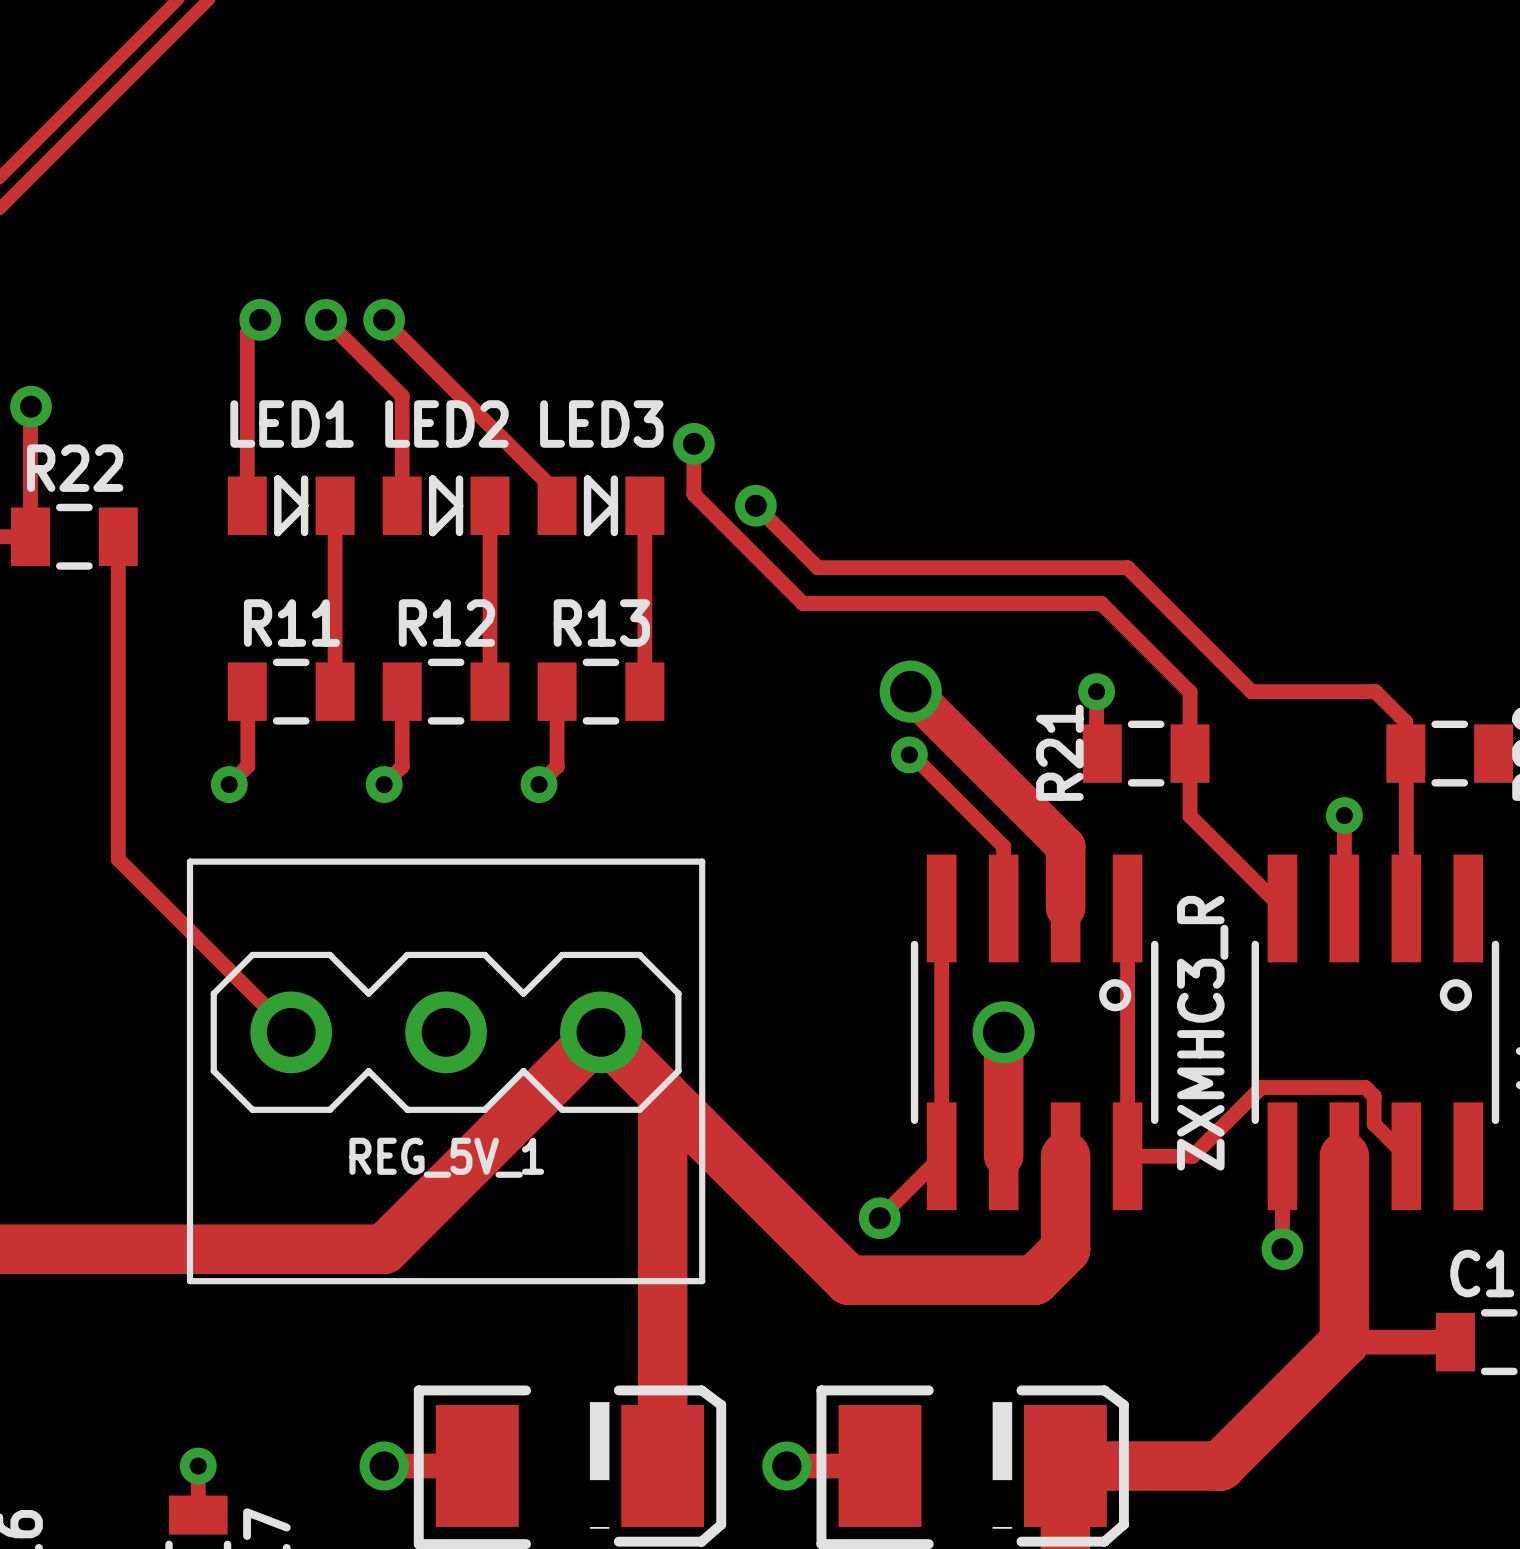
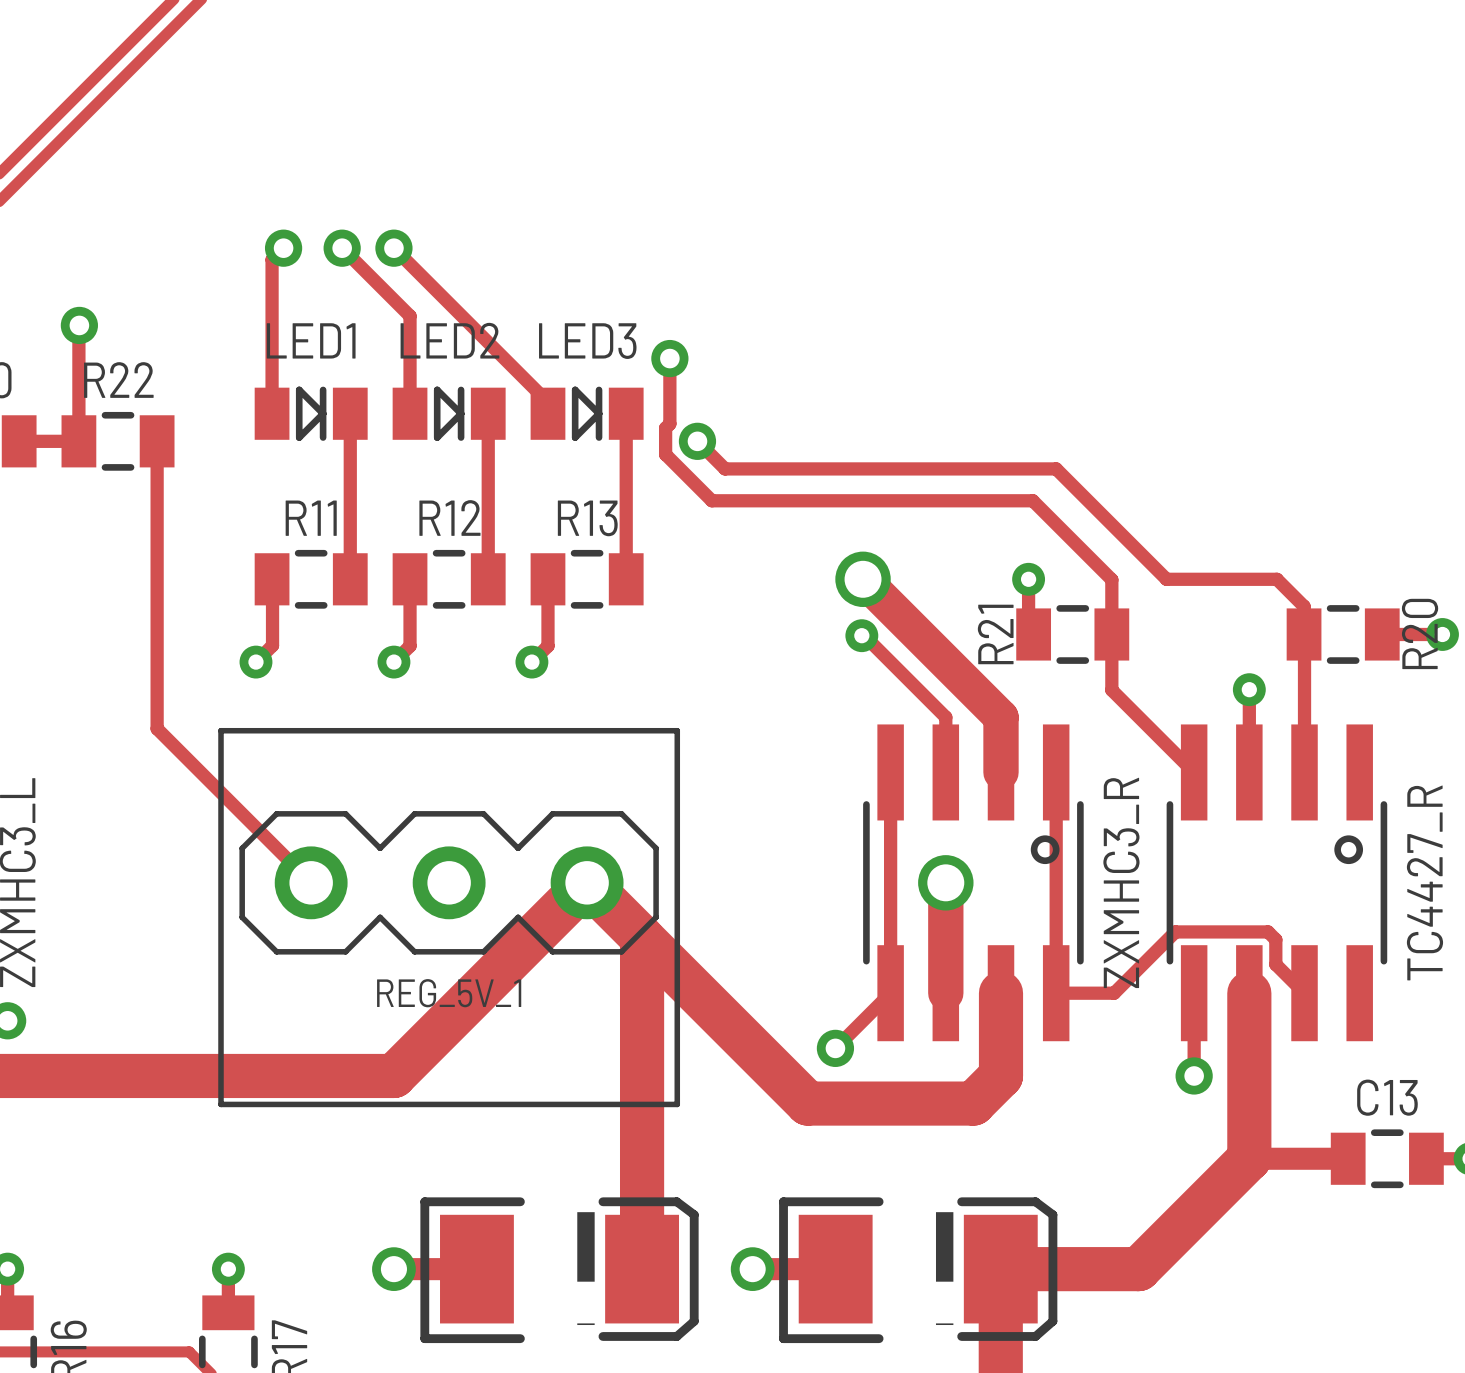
track: (693, 494) (803, 603) -> (669, 403) (669, 423) (665, 428) (665, 454) (711, 500) (767, 500)
track: (755, 505) (817, 567) -> (697, 441) (725, 468) (780, 468)
via position: (755, 505) -> (697, 441)

